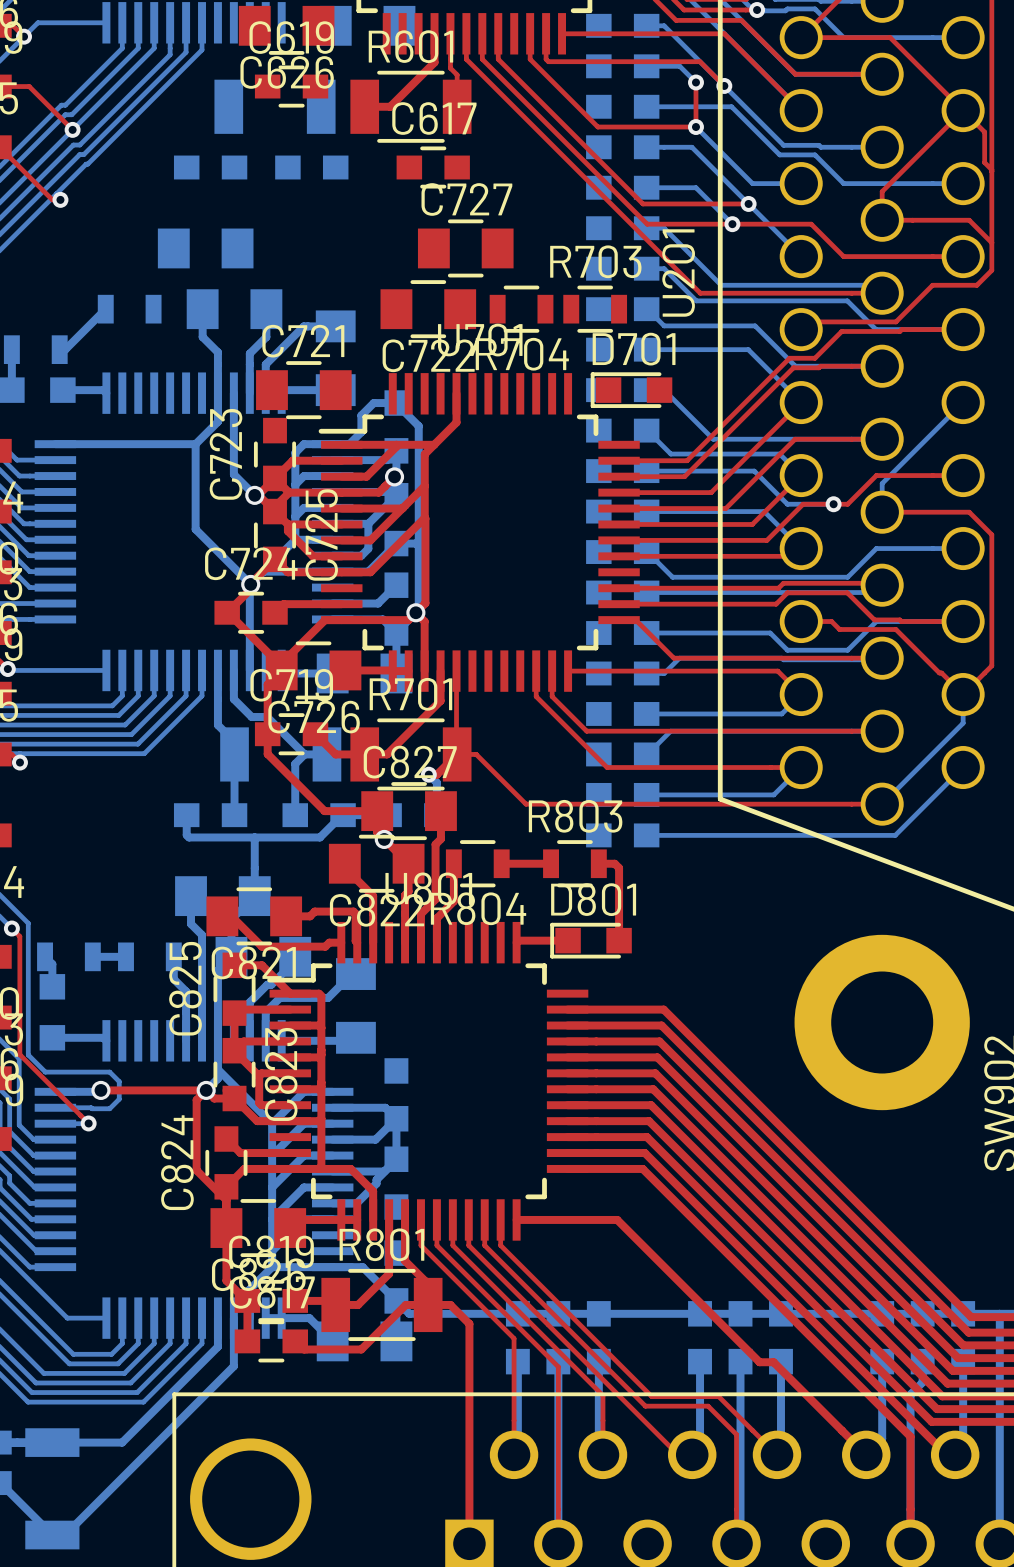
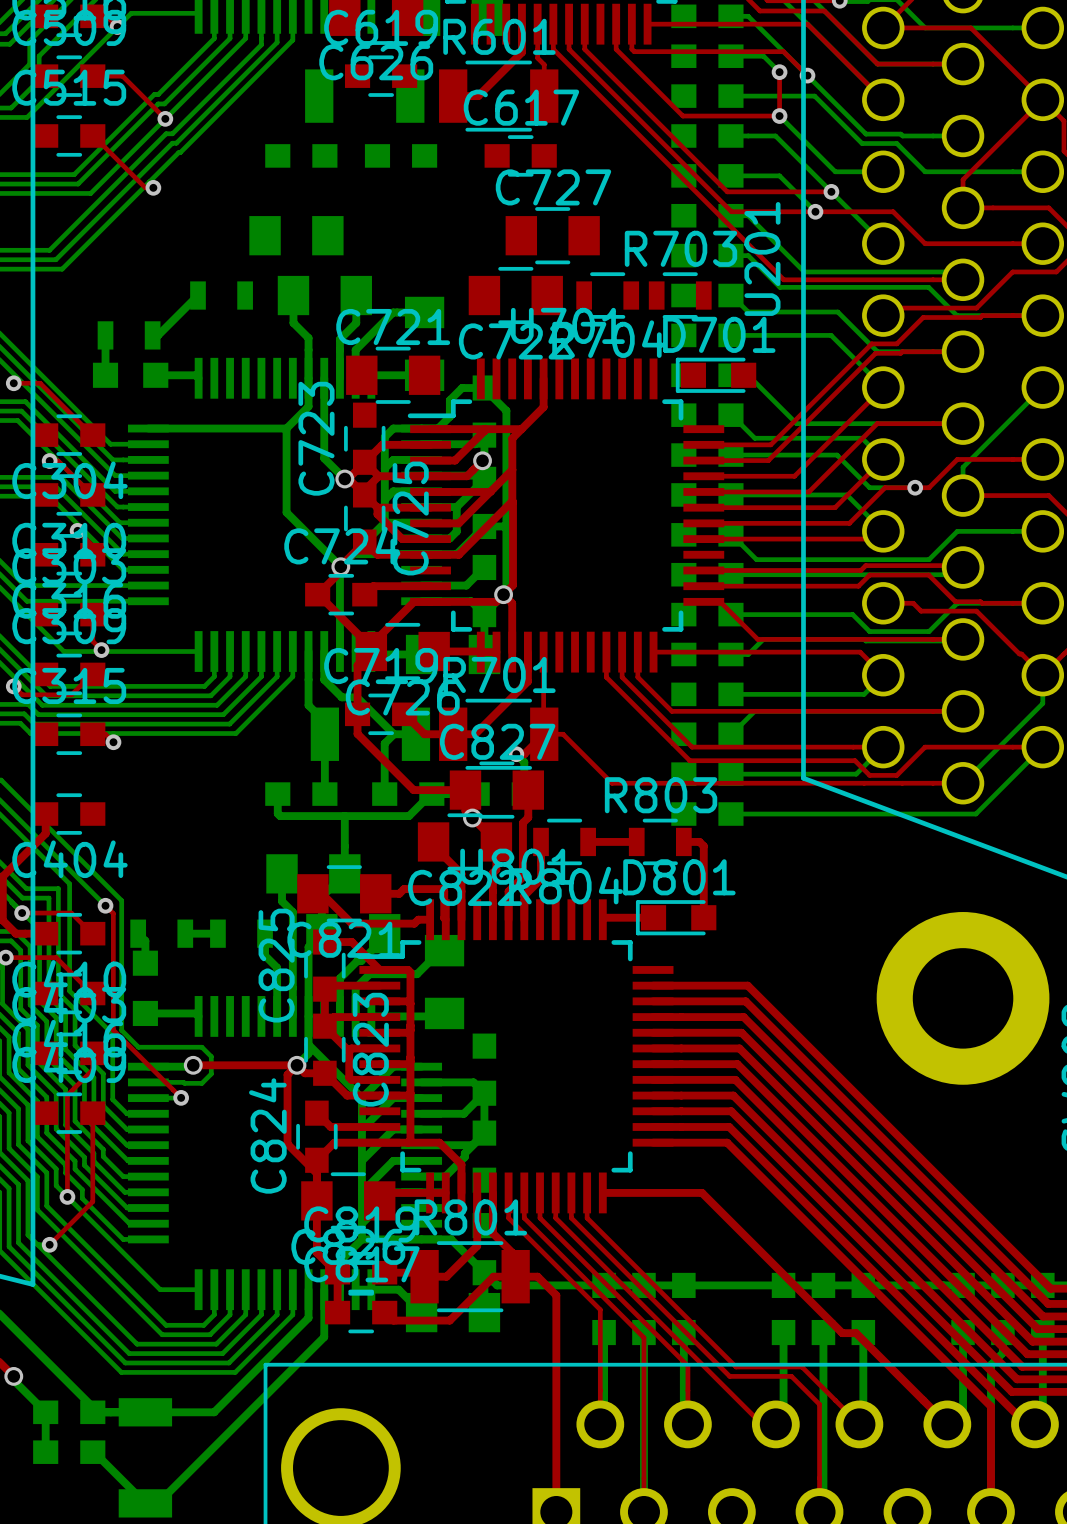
top track: none -> (606, 652) (606, 677) (689, 760) (855, 760) (869, 775) (896, 775) (925, 747) (1042, 747)

